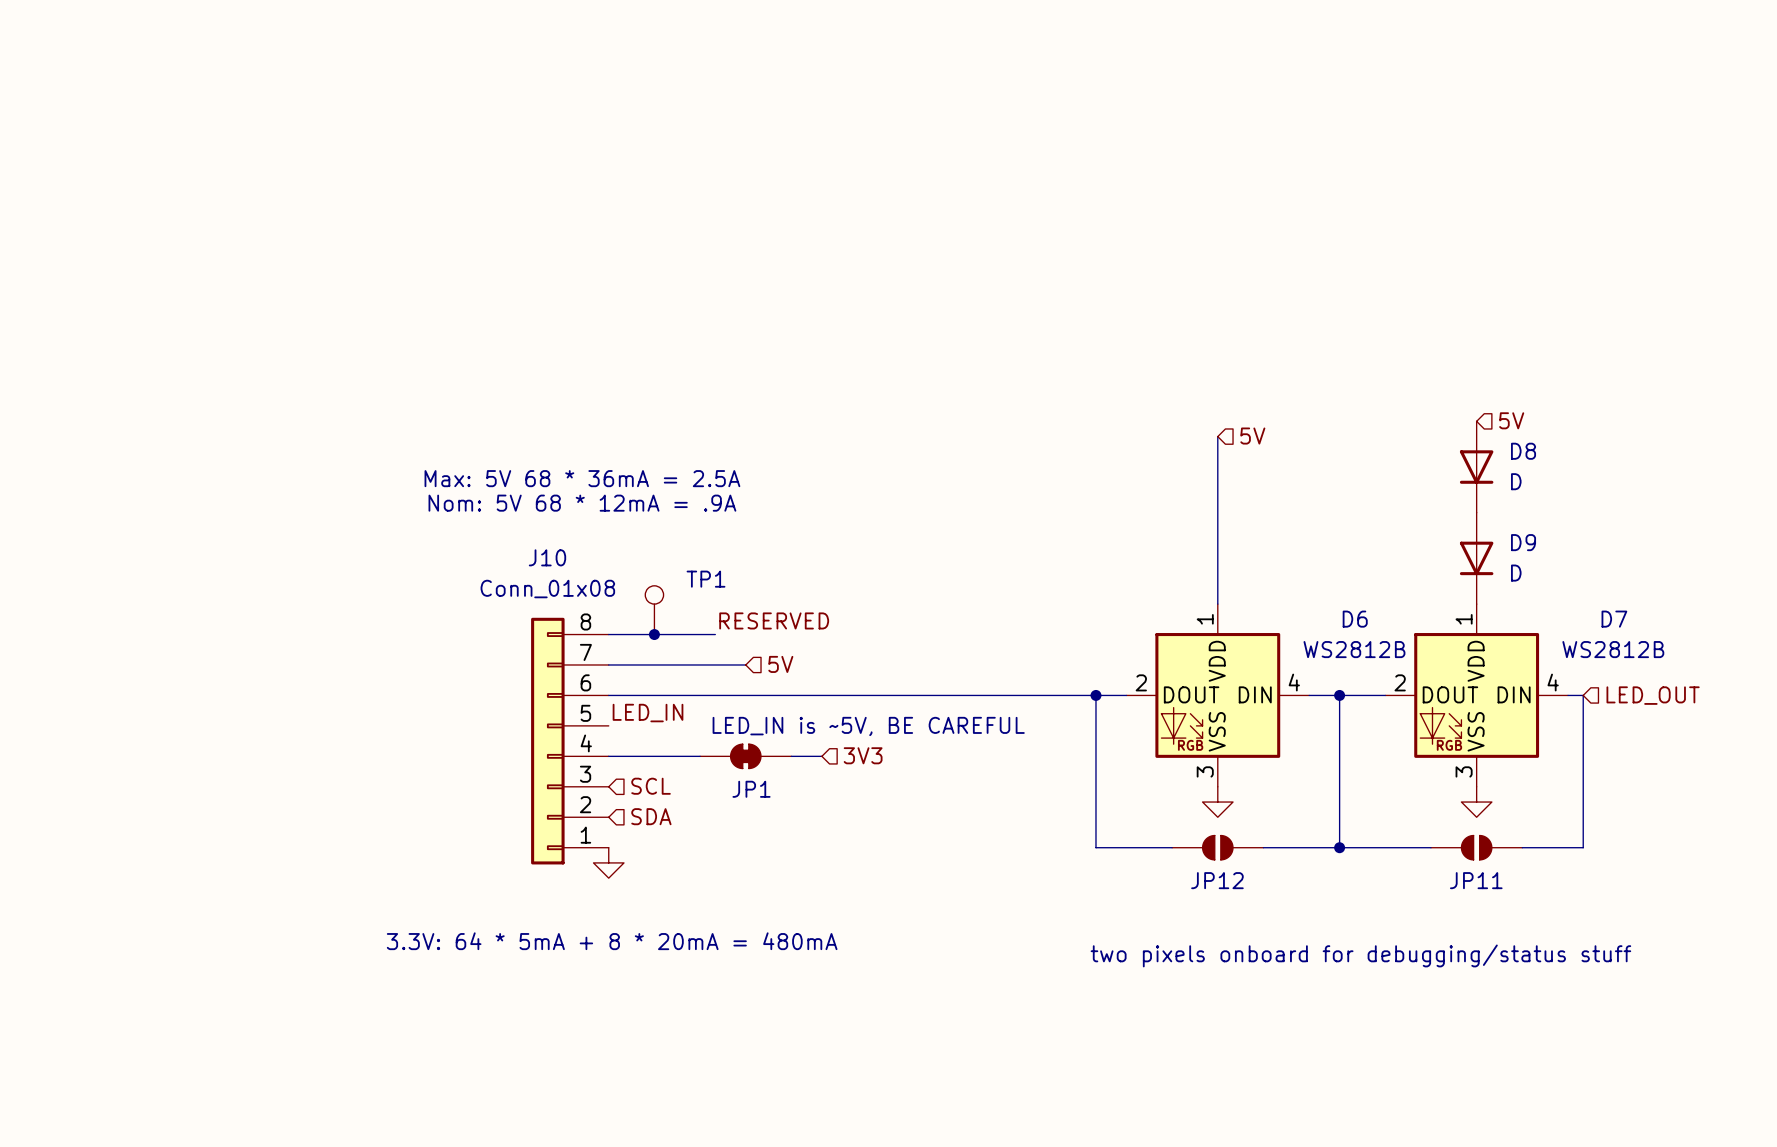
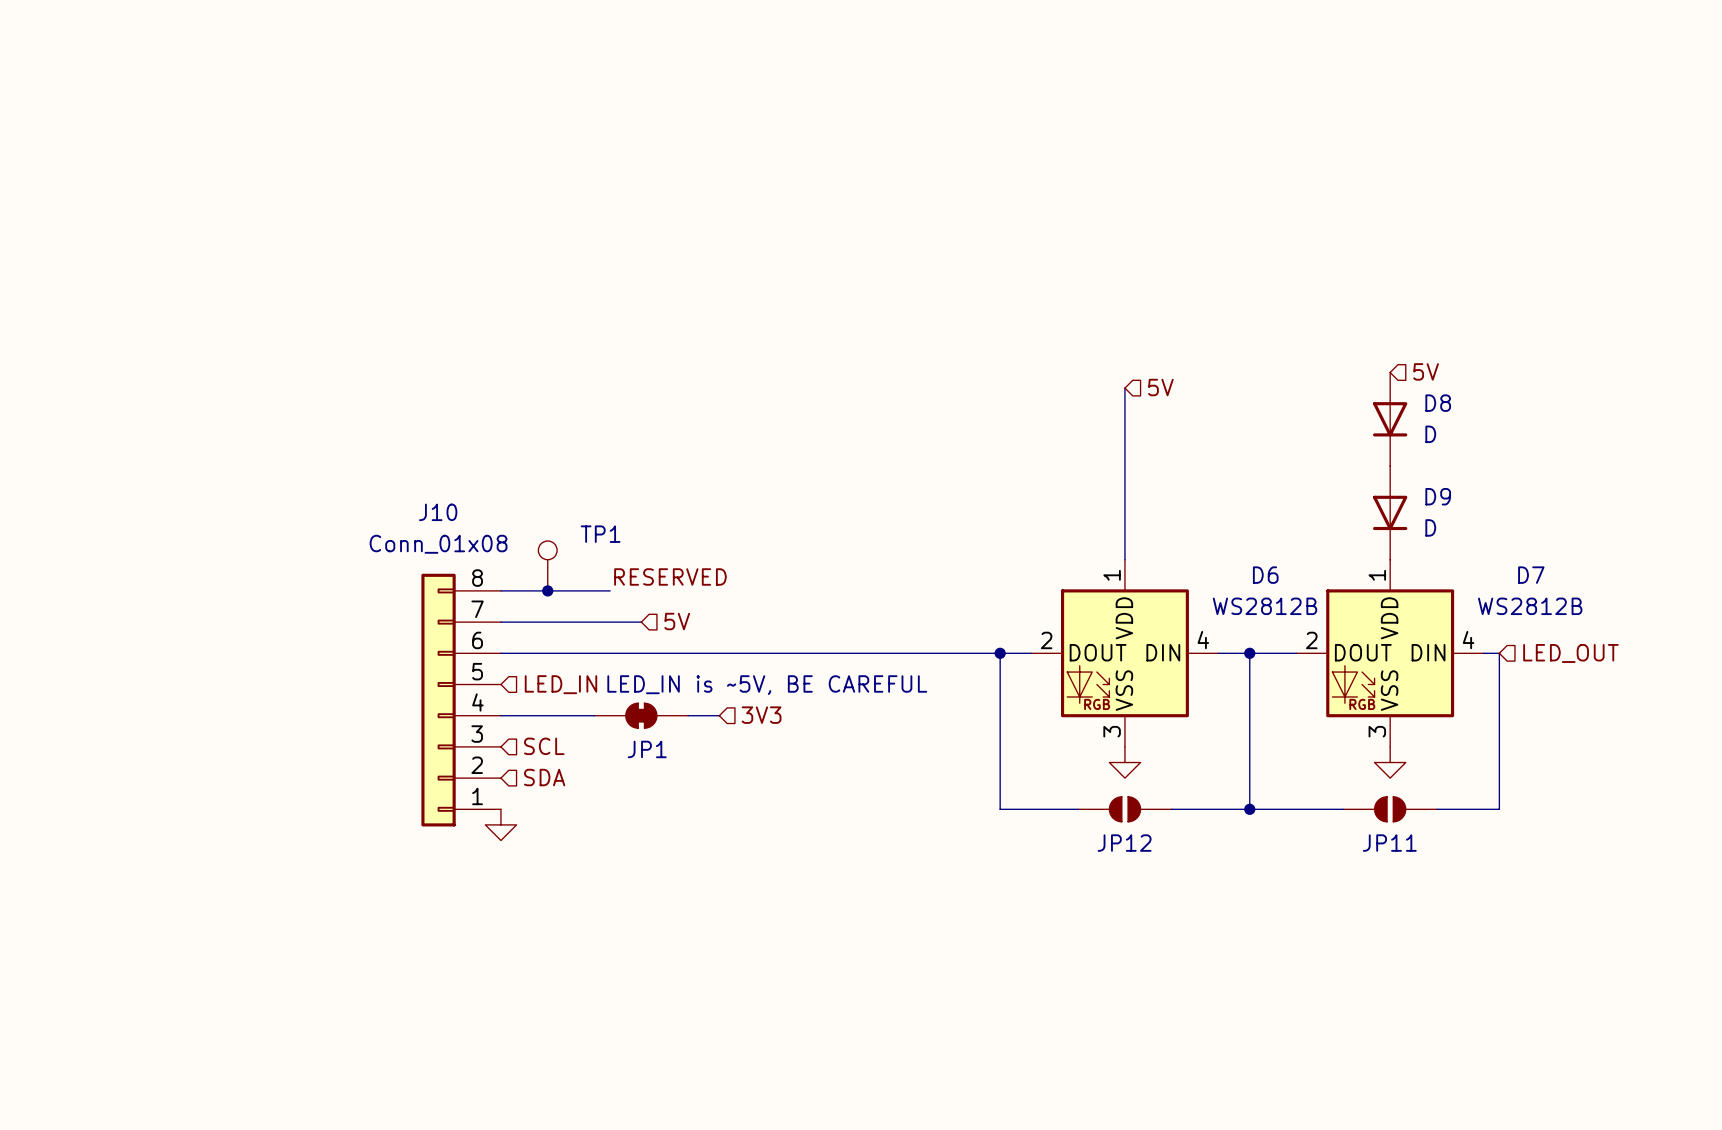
text: Max: 5V 68 * 36mA = 2.5A (582, 478) -> none
text: Nom: 5V 68 * 12mA = .9A (582, 503) -> none
label: LED_IN (648, 713) -> none
hierarchical label: none -> LED_IN (560, 684)
text: 3.3V: 64 * 5mA + 8 * 20mA = 480mA (612, 941) -> none
text: two pixels onboard for debugging/status stuff (1360, 955) -> none

